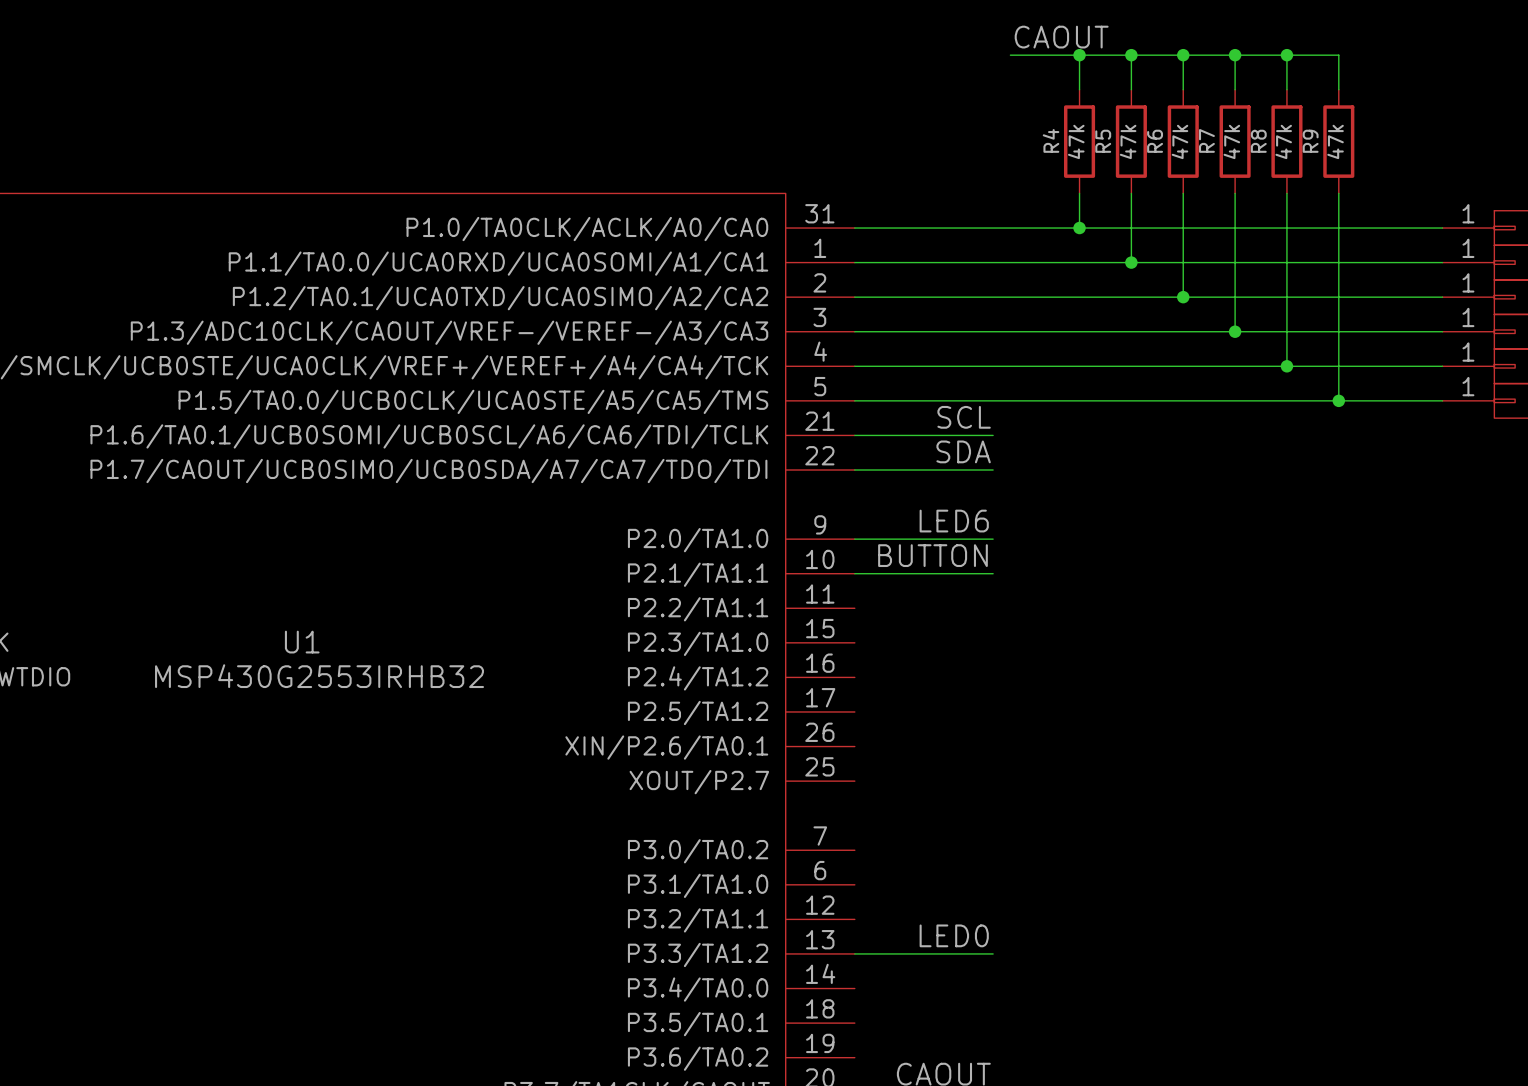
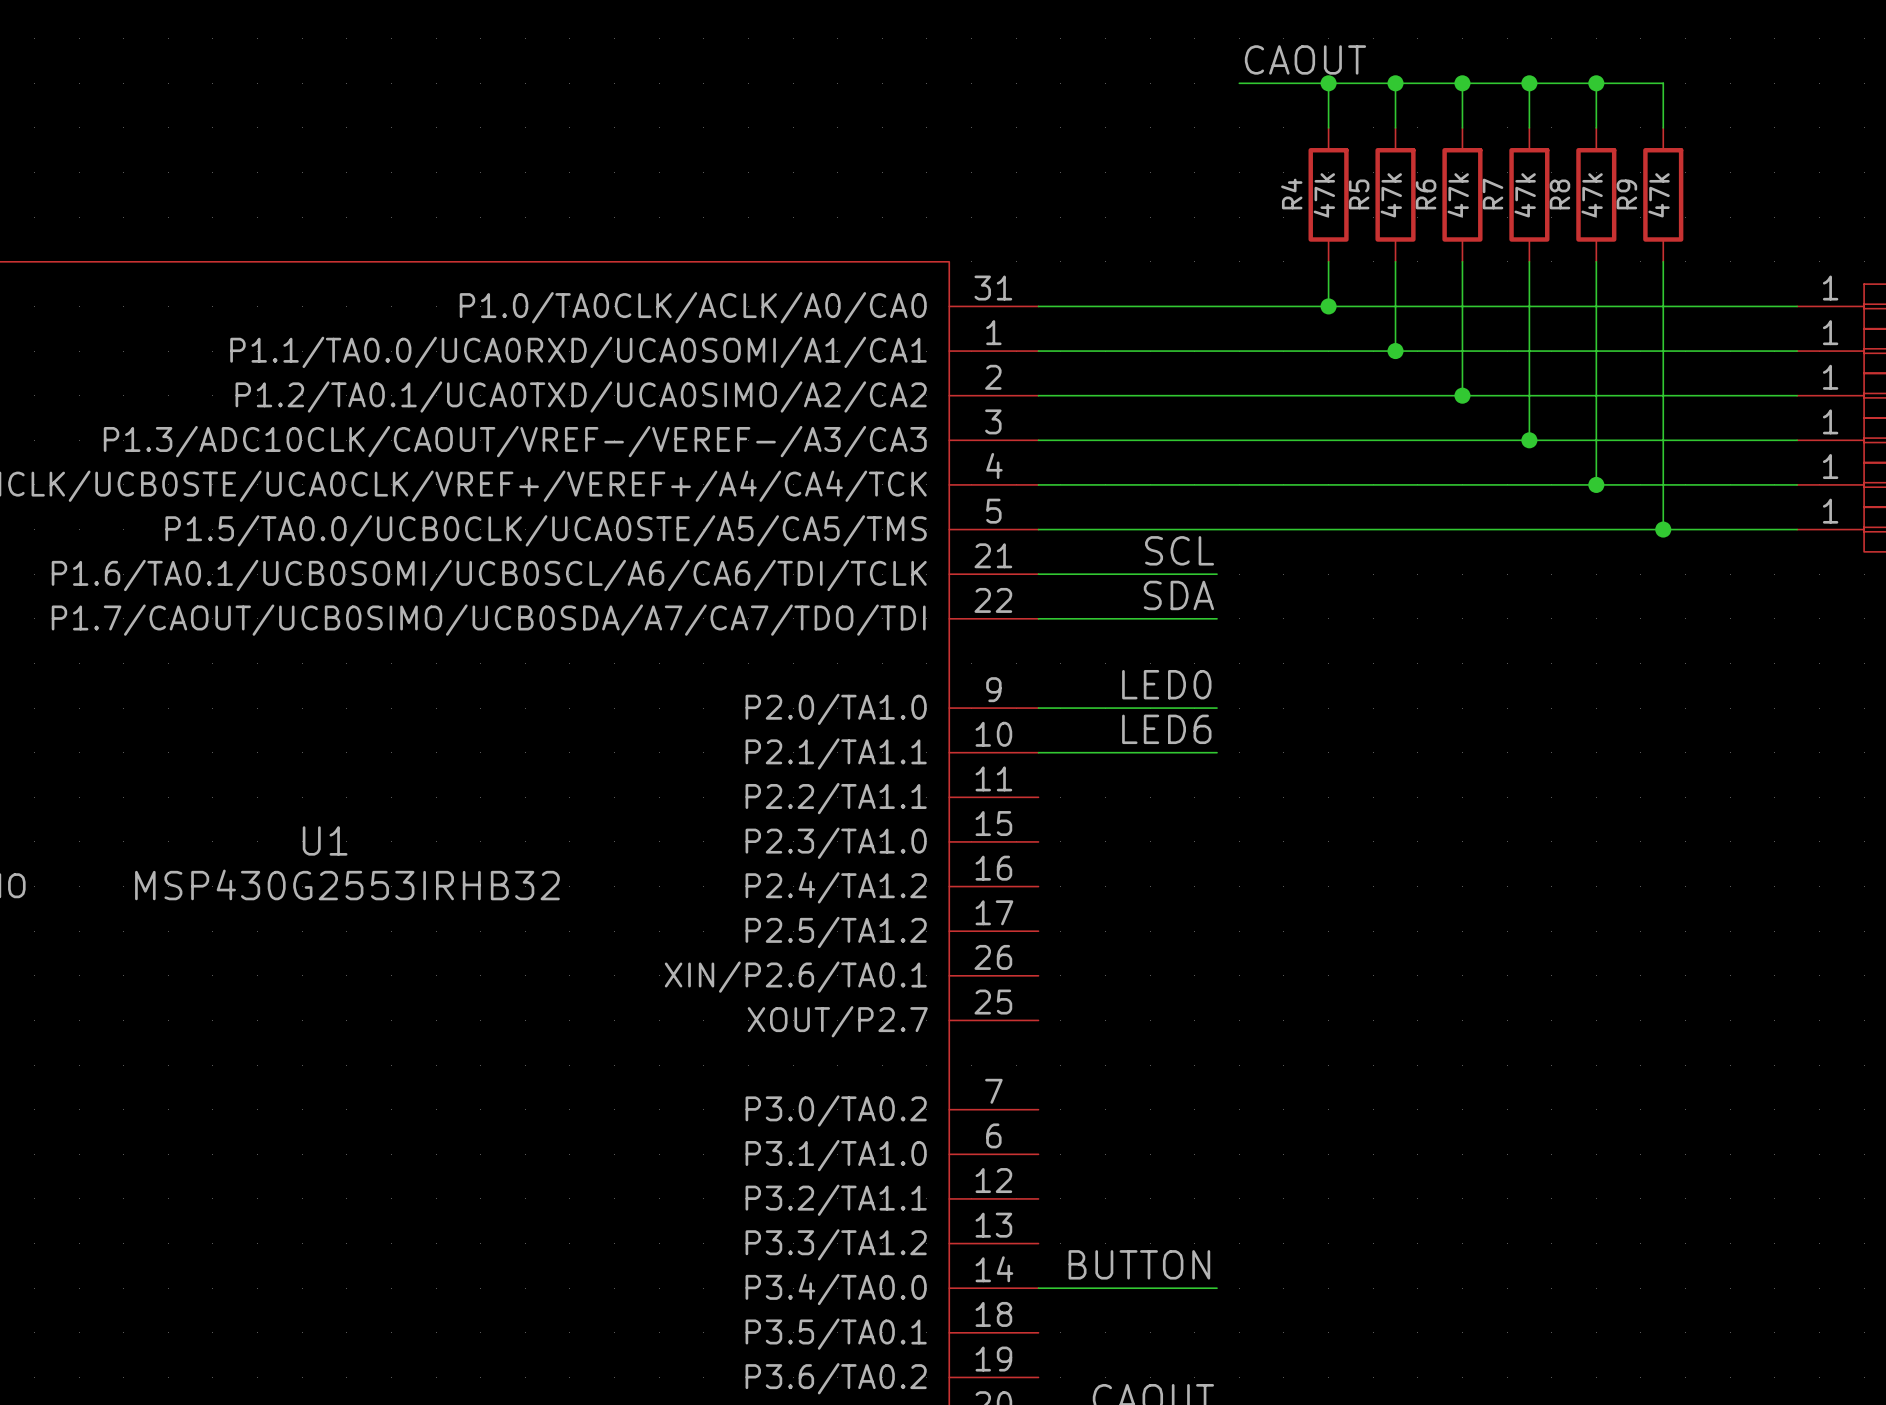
label: LED6 (954, 521) -> LED0 (1166, 684)
label: BUTTON (932, 555) -> LED6 (1166, 729)
label: LED0 (954, 935) -> none
wire: (854, 953) (993, 953) -> (1038, 1288) (1217, 1288)
label: none -> BUTTON (1139, 1264)

